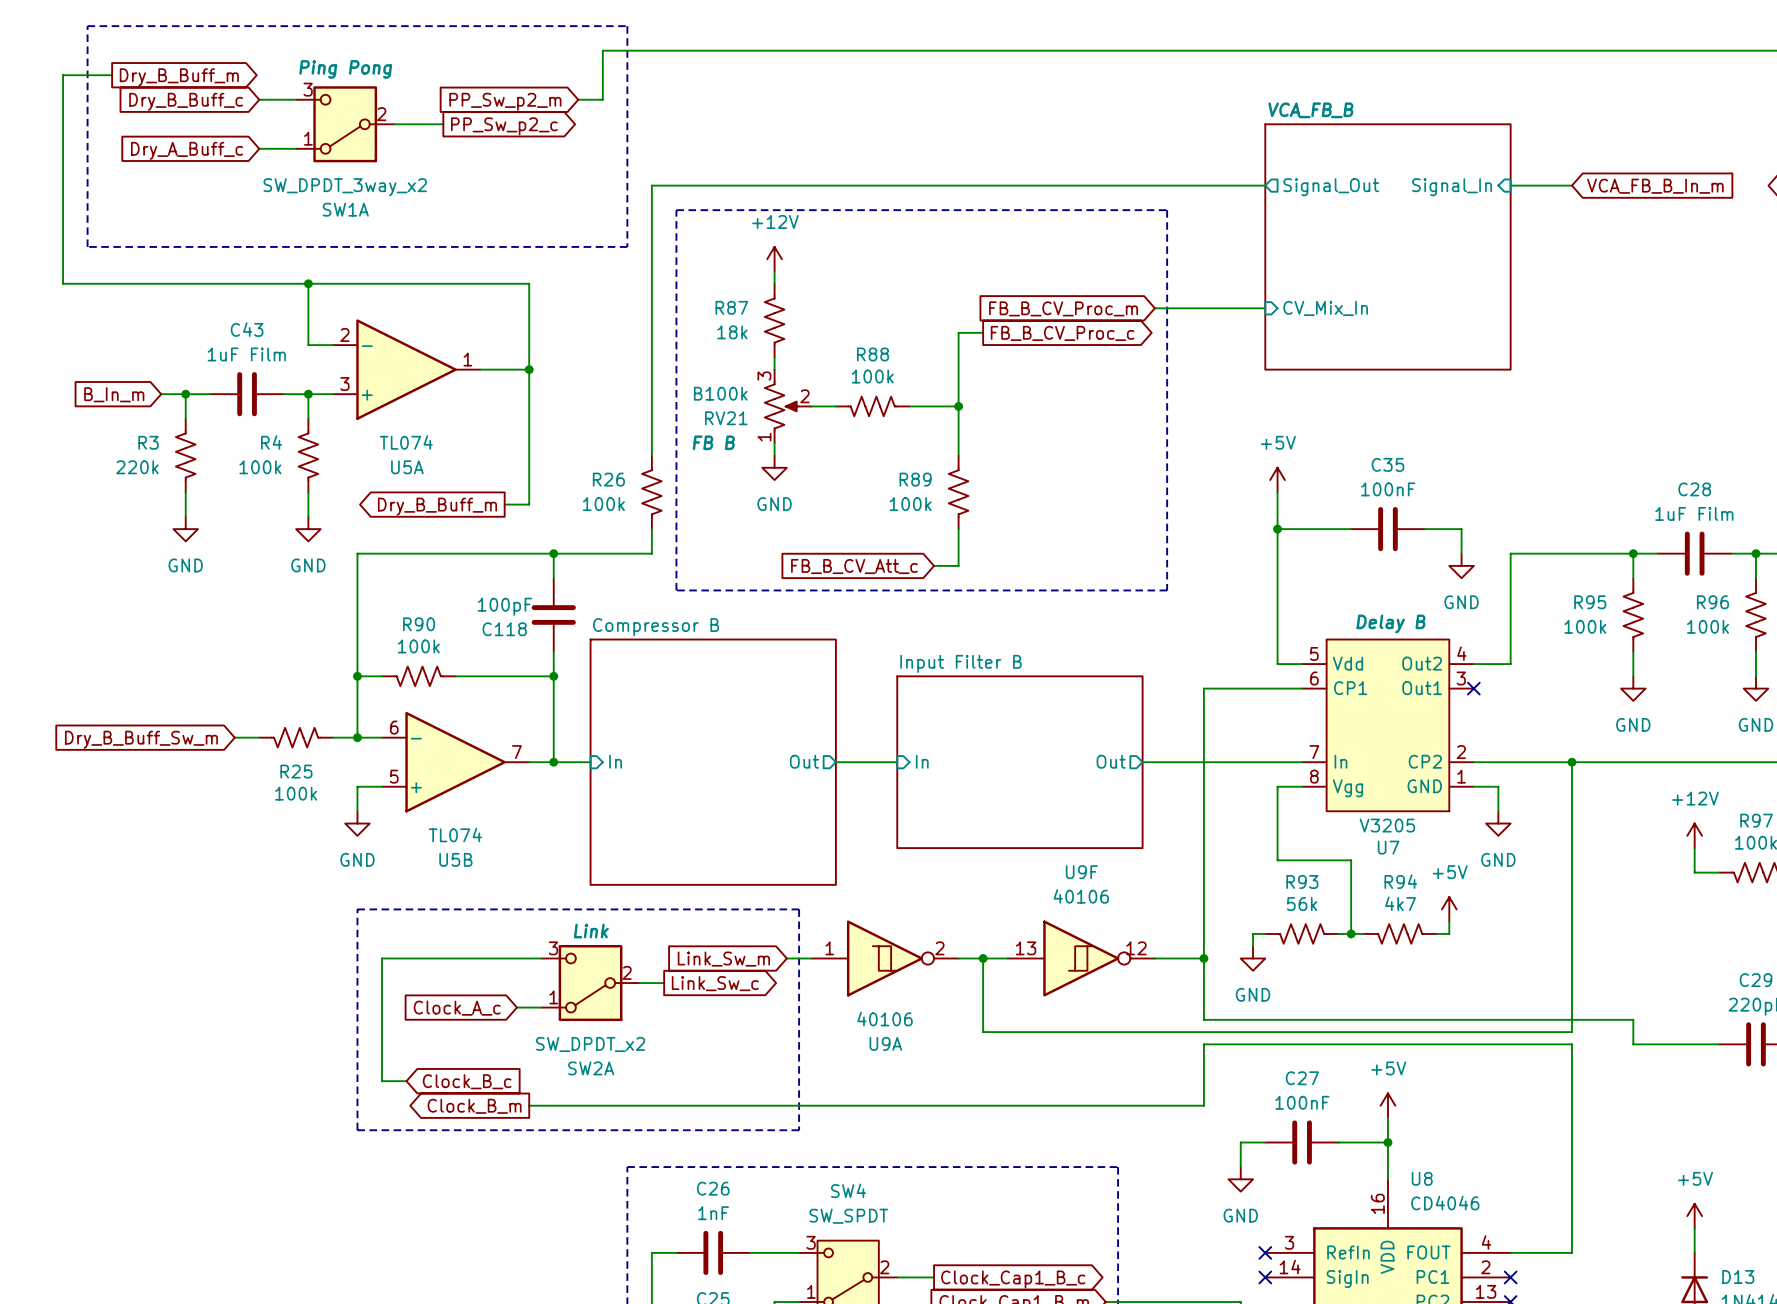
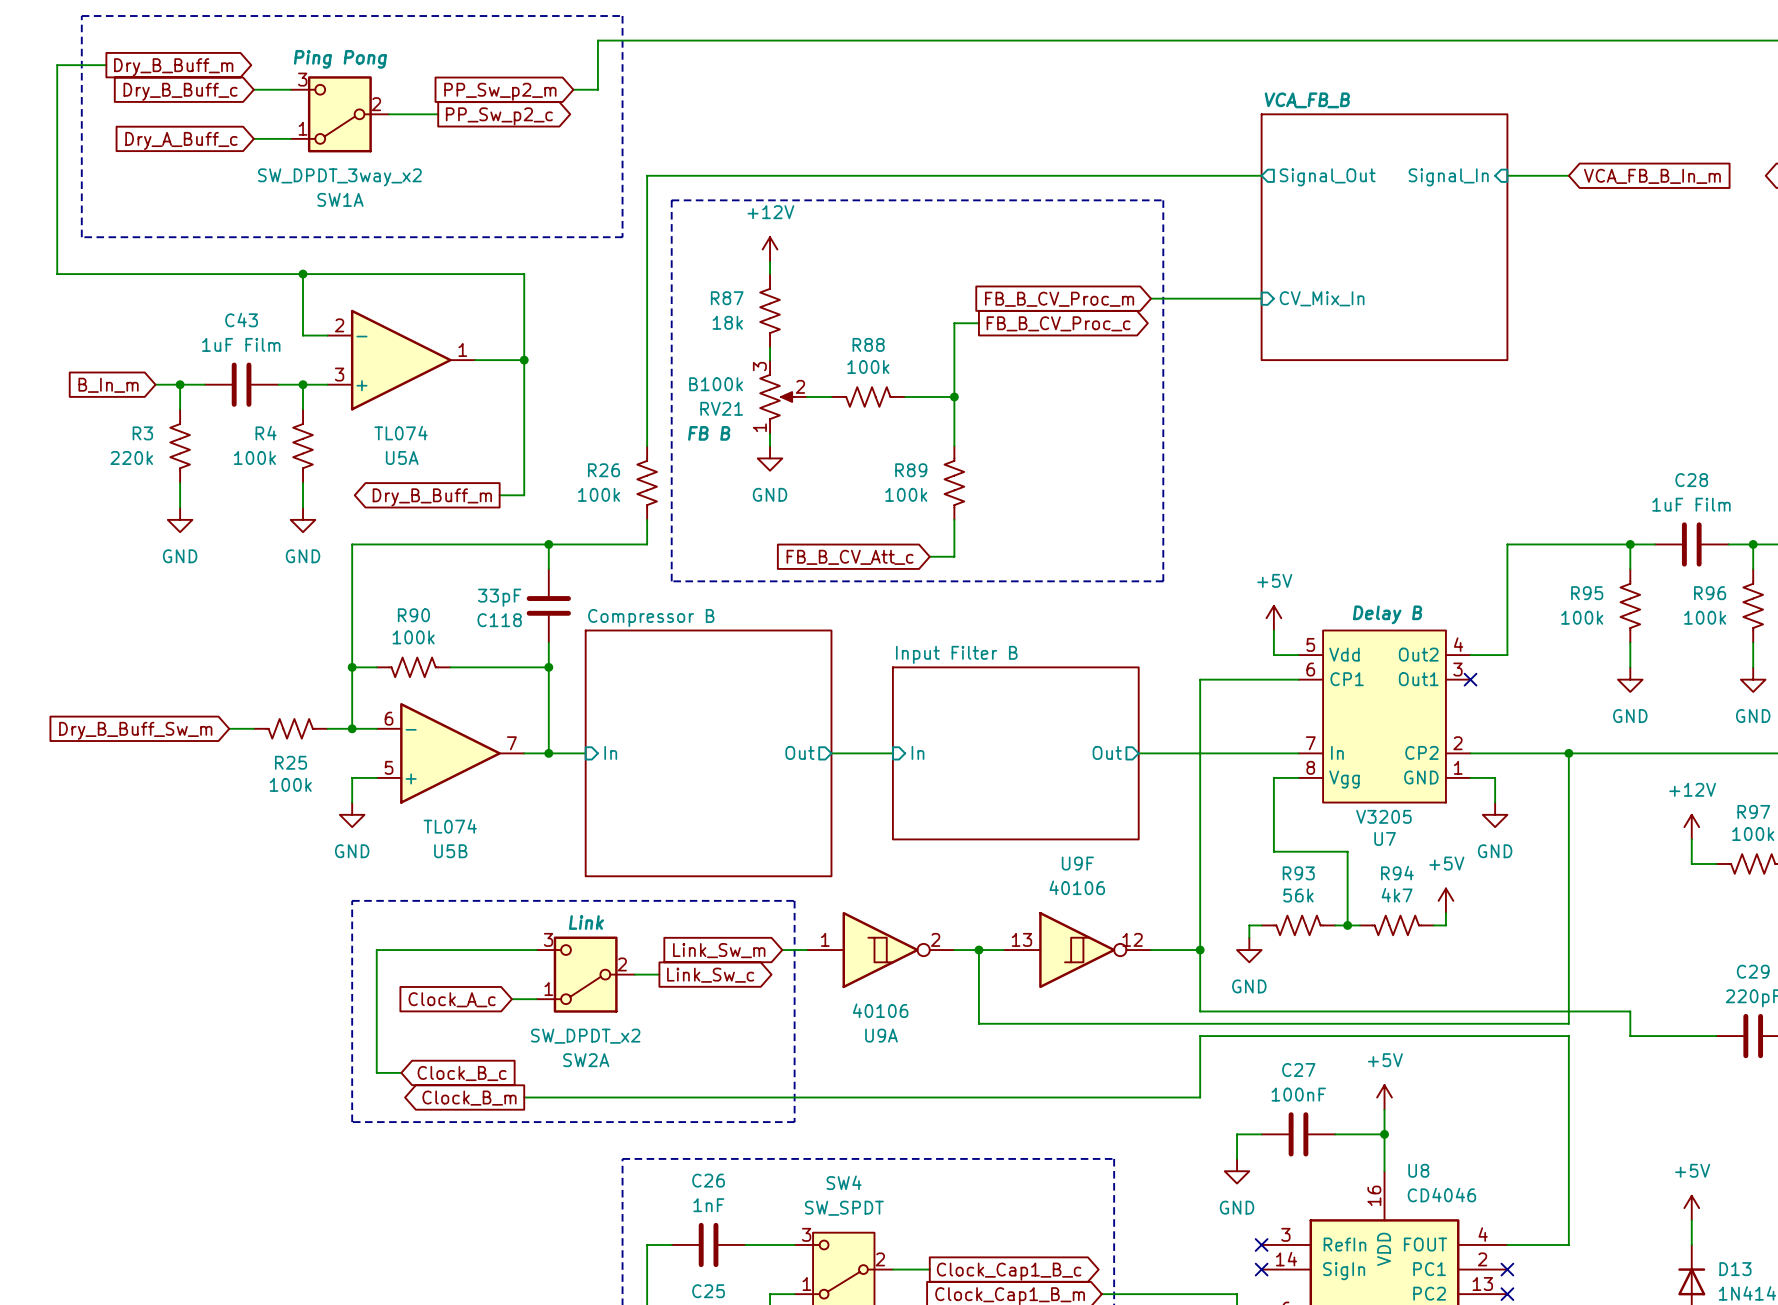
power symbol position: +5V (1277, 480) -> +5V (1273, 618)
wire: (1277, 492) (1277, 639) -> none
wire: (1277, 529) (1351, 529) -> none
junction: (1277, 529) -> none
C35: 100nF (1387, 529) -> none
wire: (1424, 529) (1461, 529) (1461, 553) -> none
power symbol: GND (1461, 565) -> none
C118 value: 100pF (504, 606) -> 33pF (499, 597)

